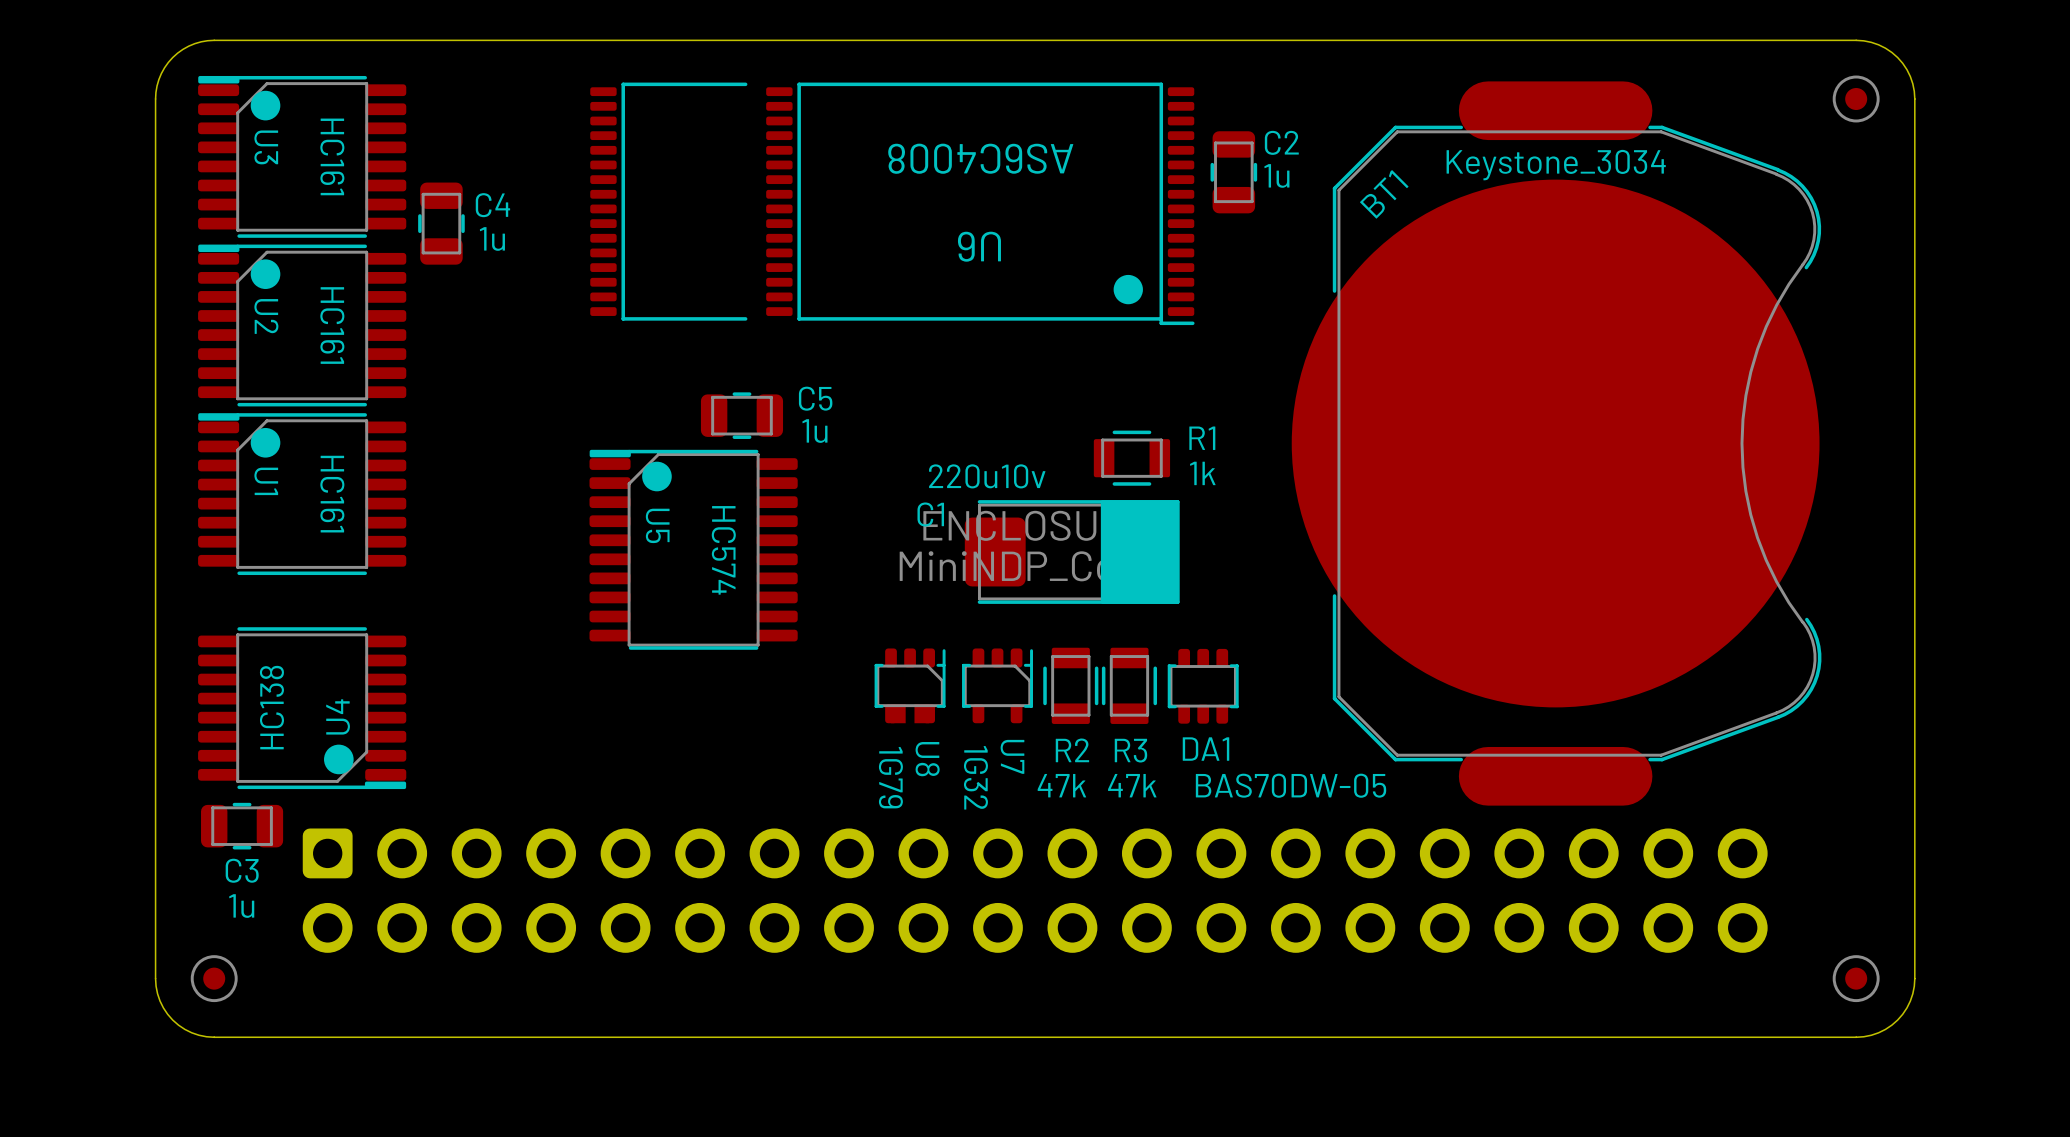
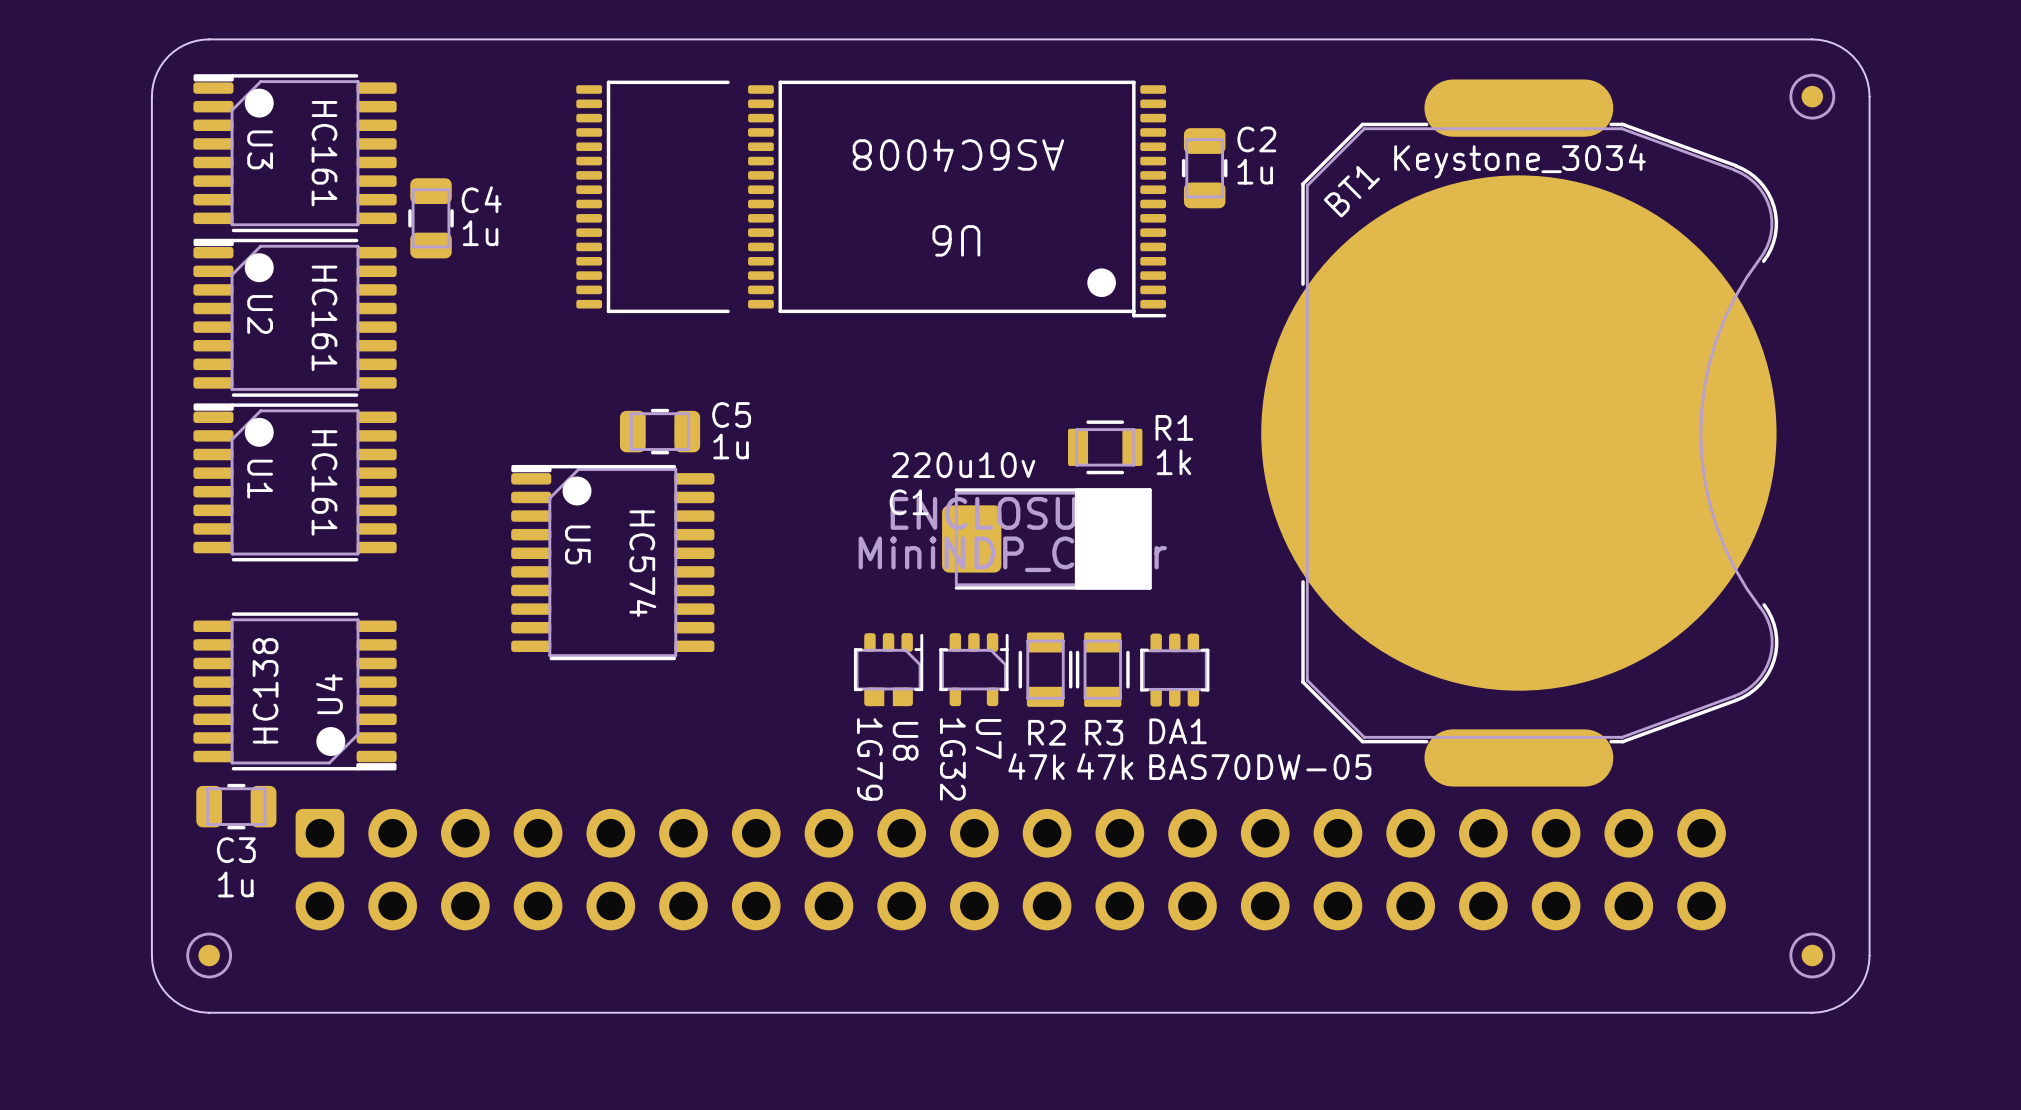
C5 position: (741, 415) -> (660, 431)
U5 position: (693, 549) -> (612, 562)

